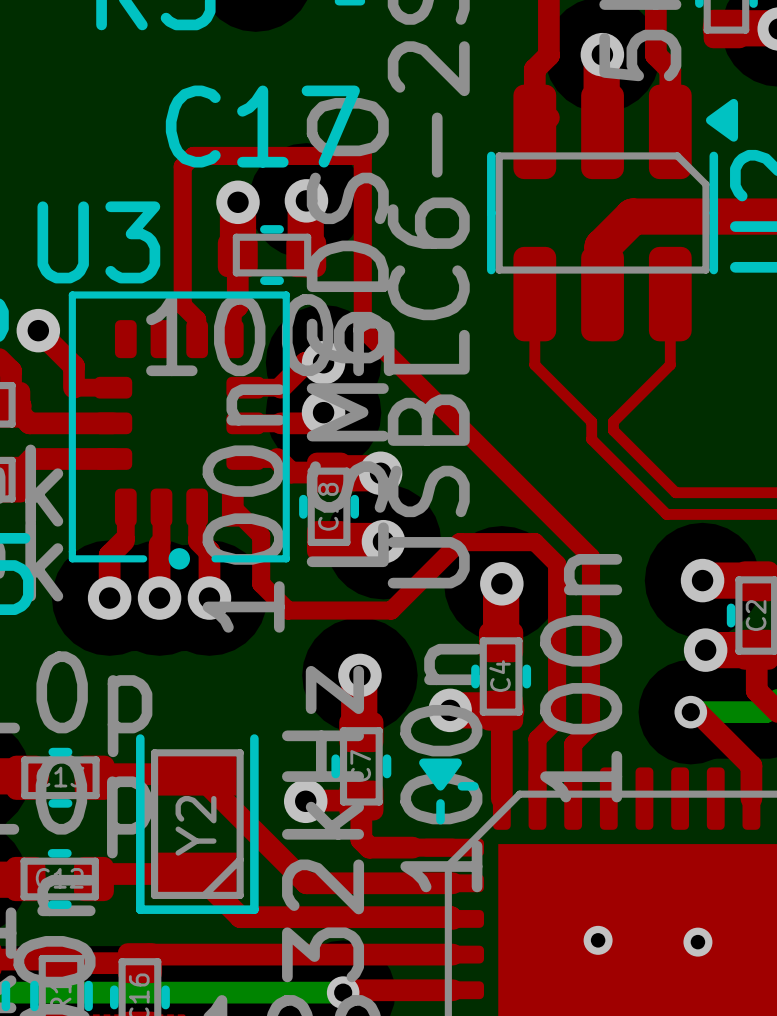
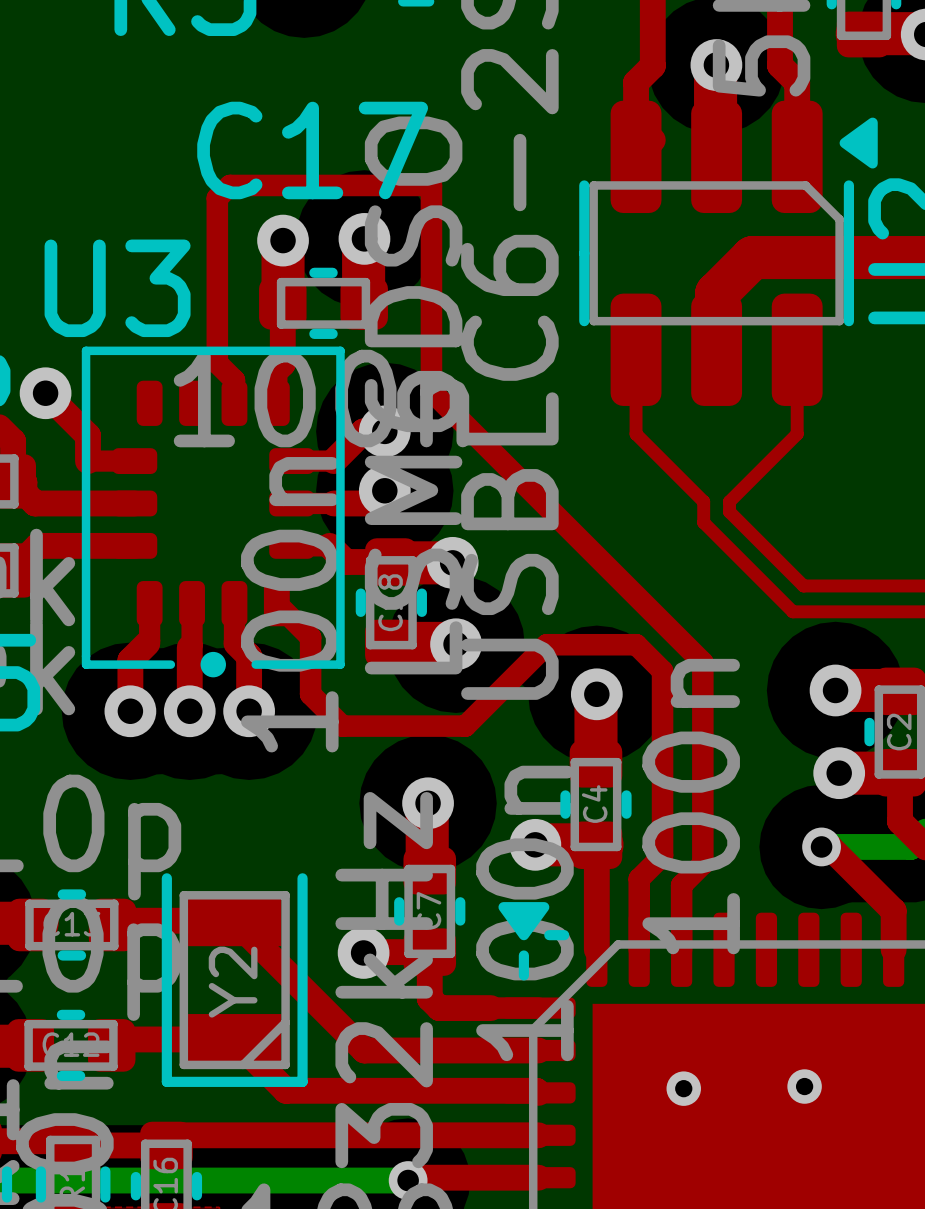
via position: (598, 940) -> (683, 1088)
via position: (697, 942) -> (804, 1086)

